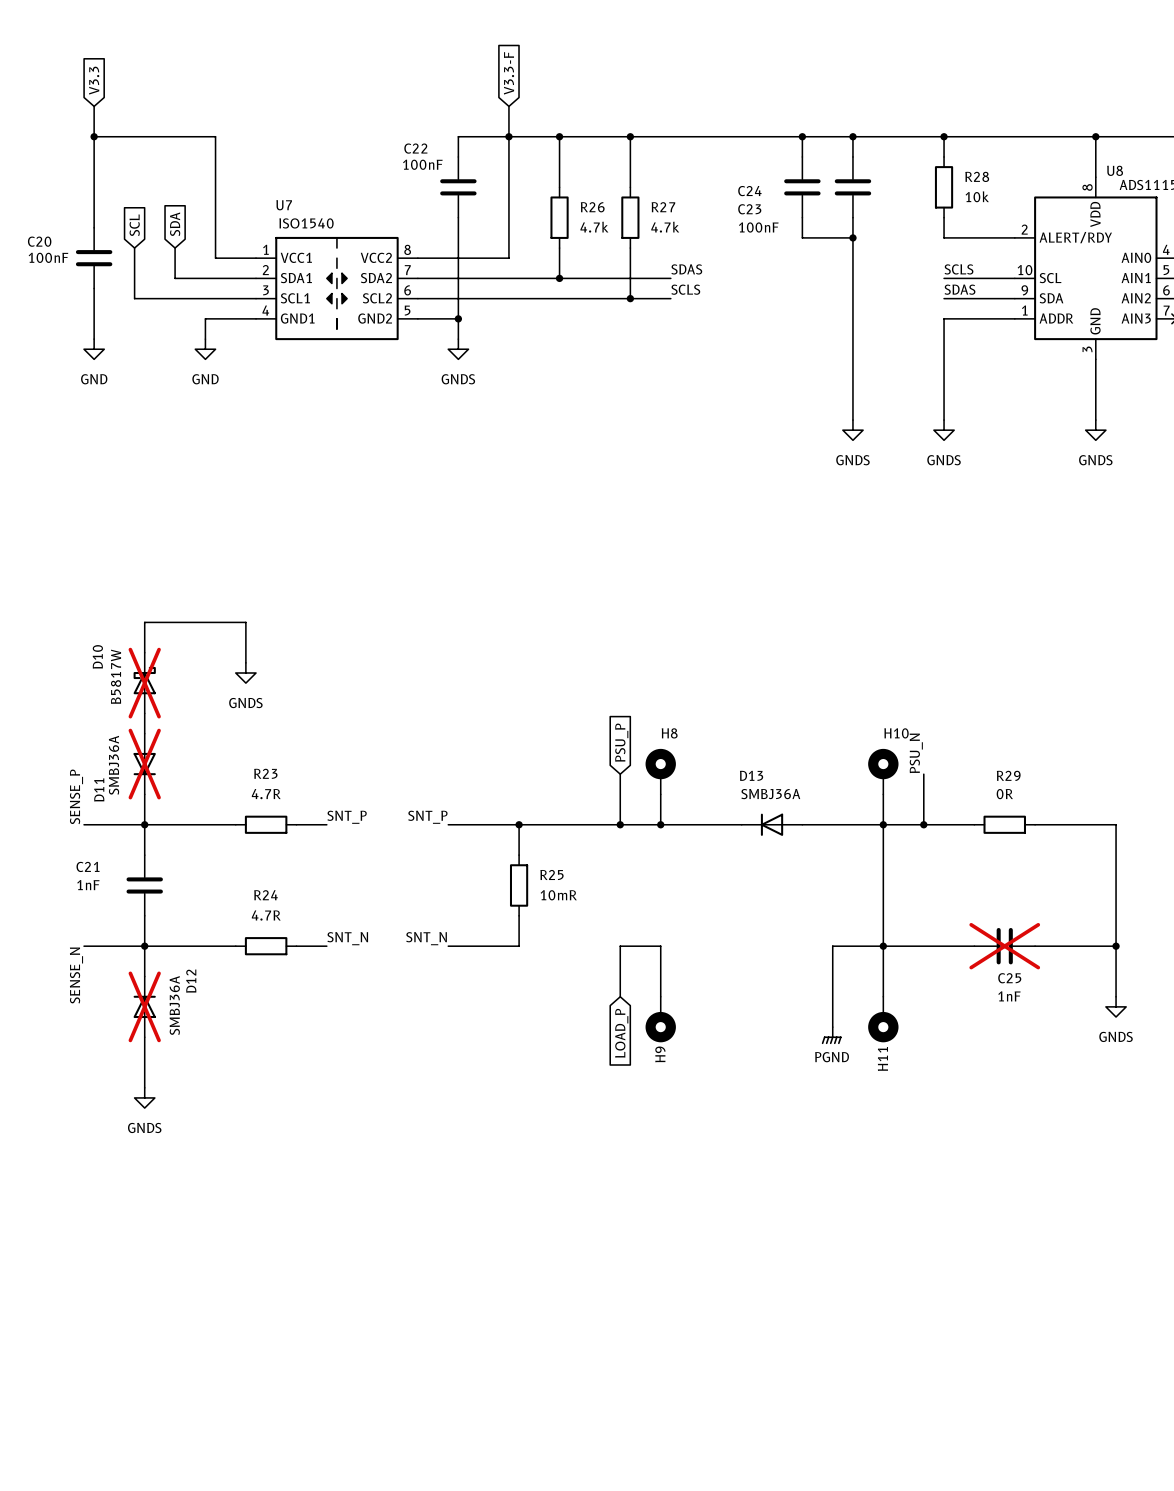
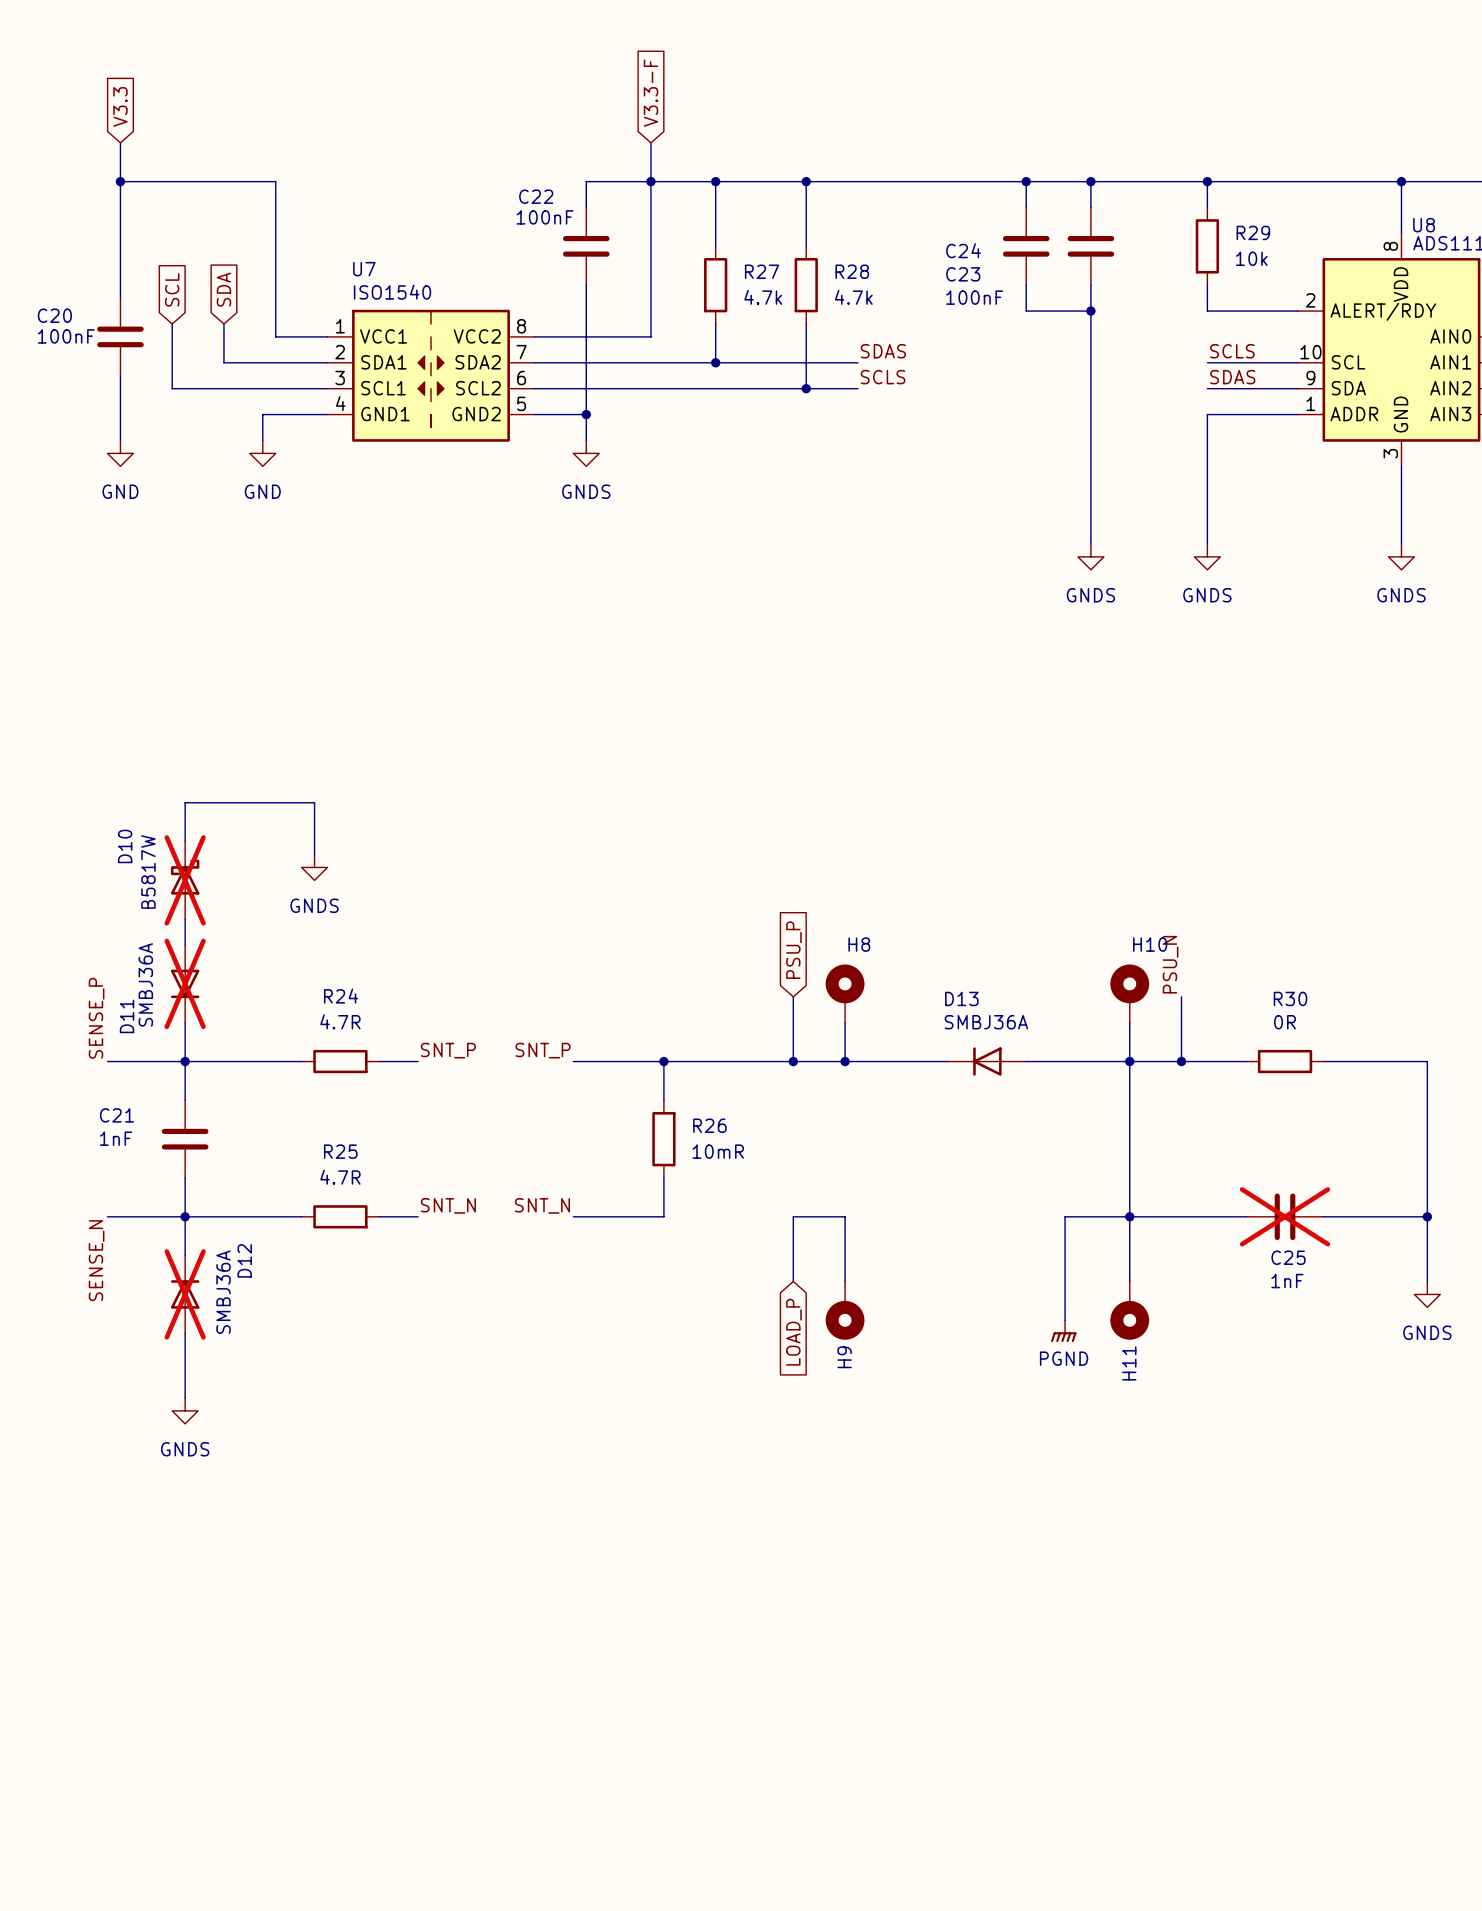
R28 name: R28 (977, 176) -> R29 (1253, 232)
R26 name: R26 (592, 207) -> R27 (761, 271)
R27 name: R27 (663, 207) -> R28 (852, 271)
R23 name: R23 (265, 773) -> R24 (341, 996)
R29 name: R29 (1008, 775) -> R30 (1290, 998)
R25 name: R25 (551, 874) -> R26 (709, 1125)
R24 name: R24 (265, 895) -> R25 (340, 1151)

